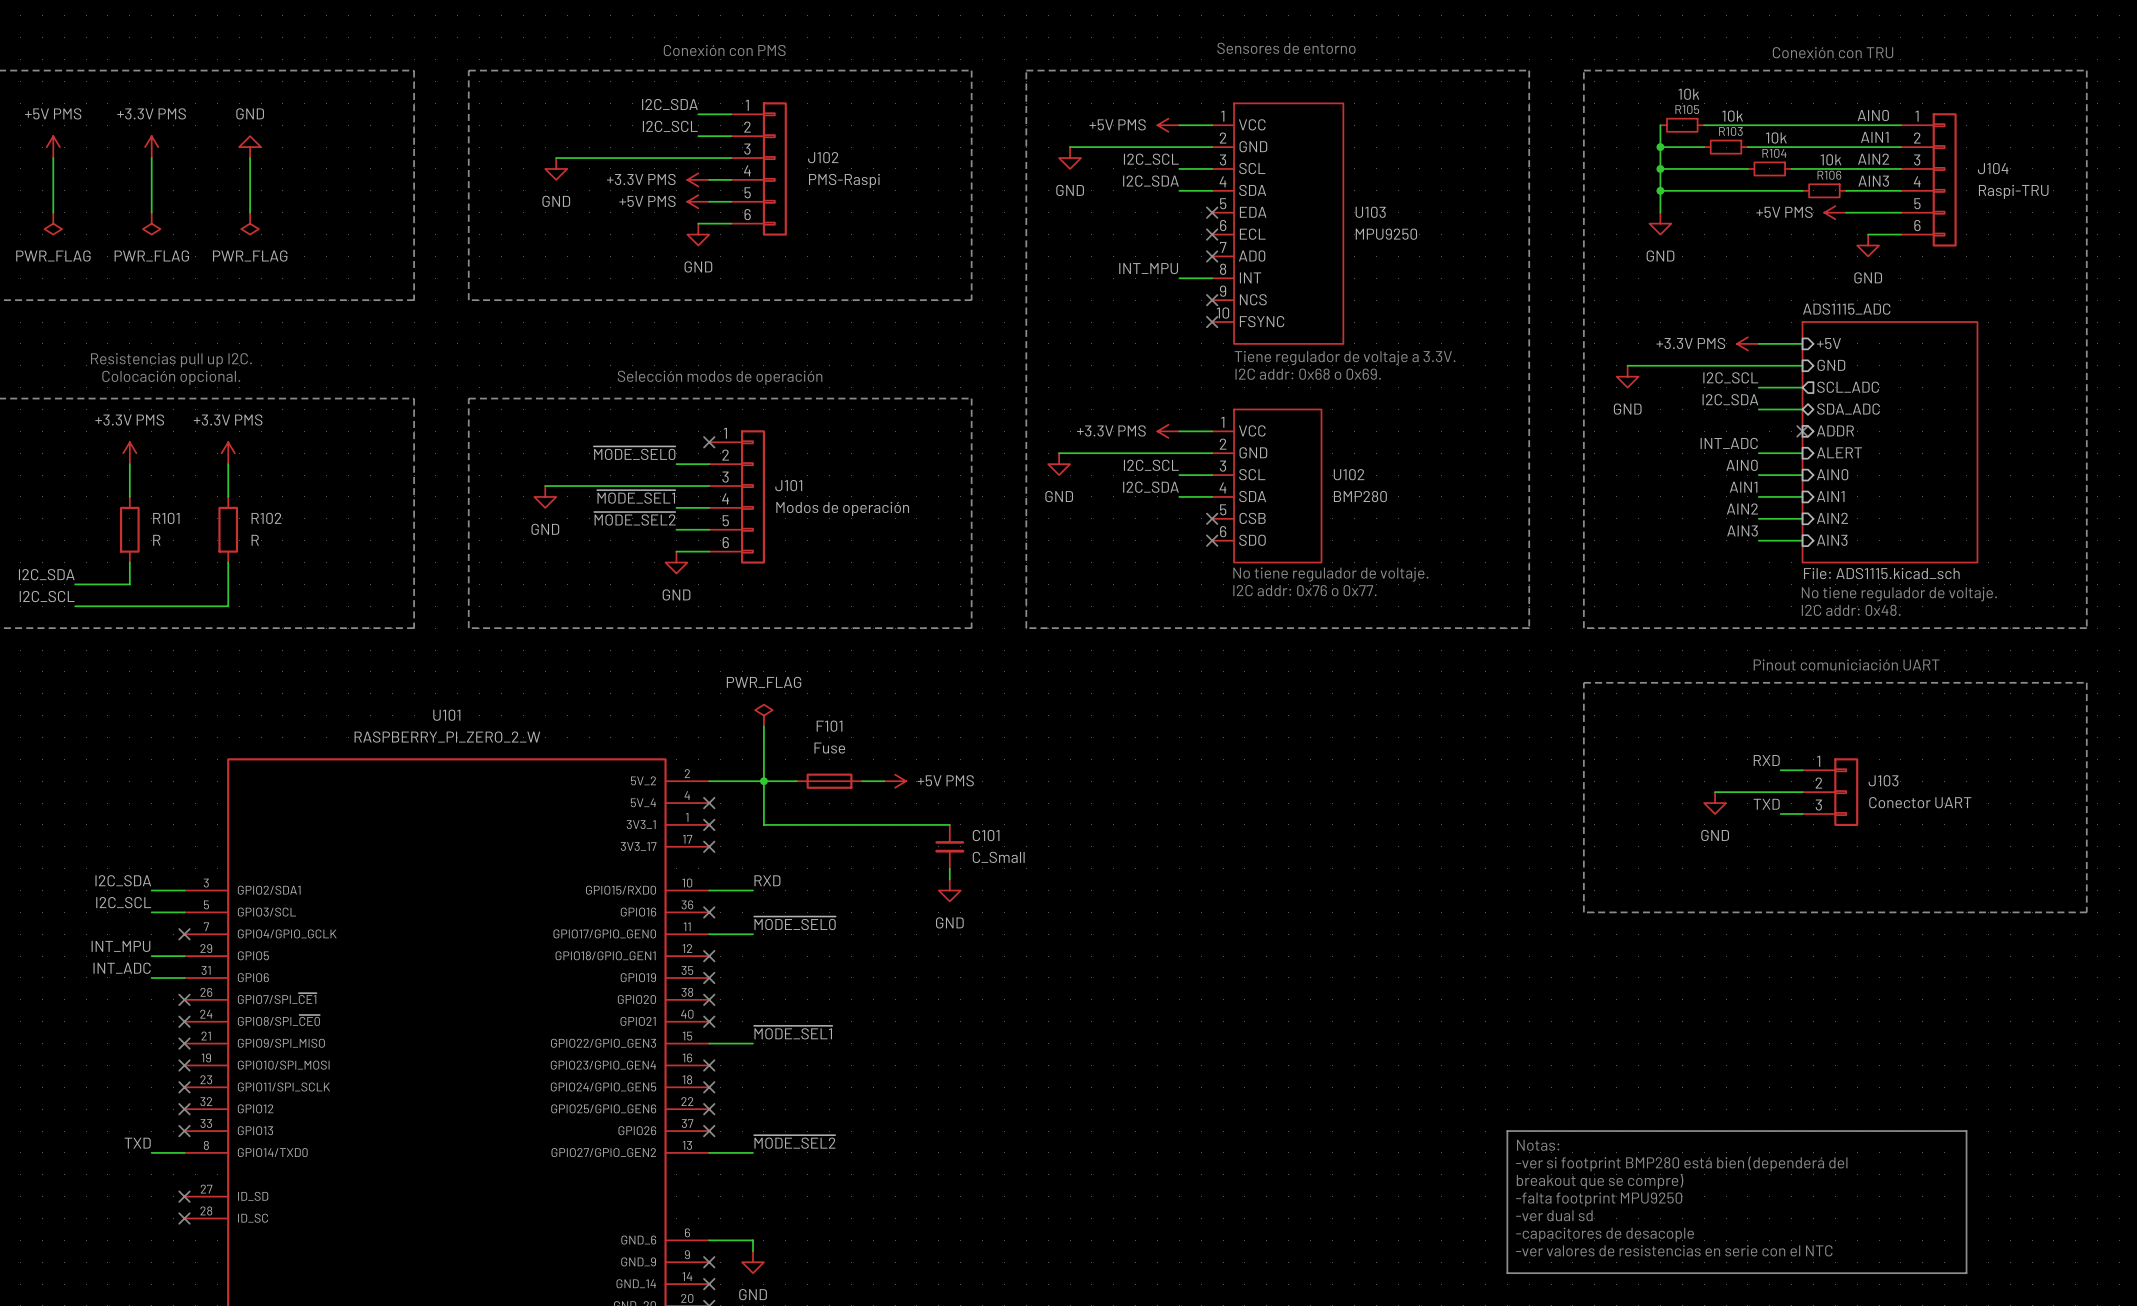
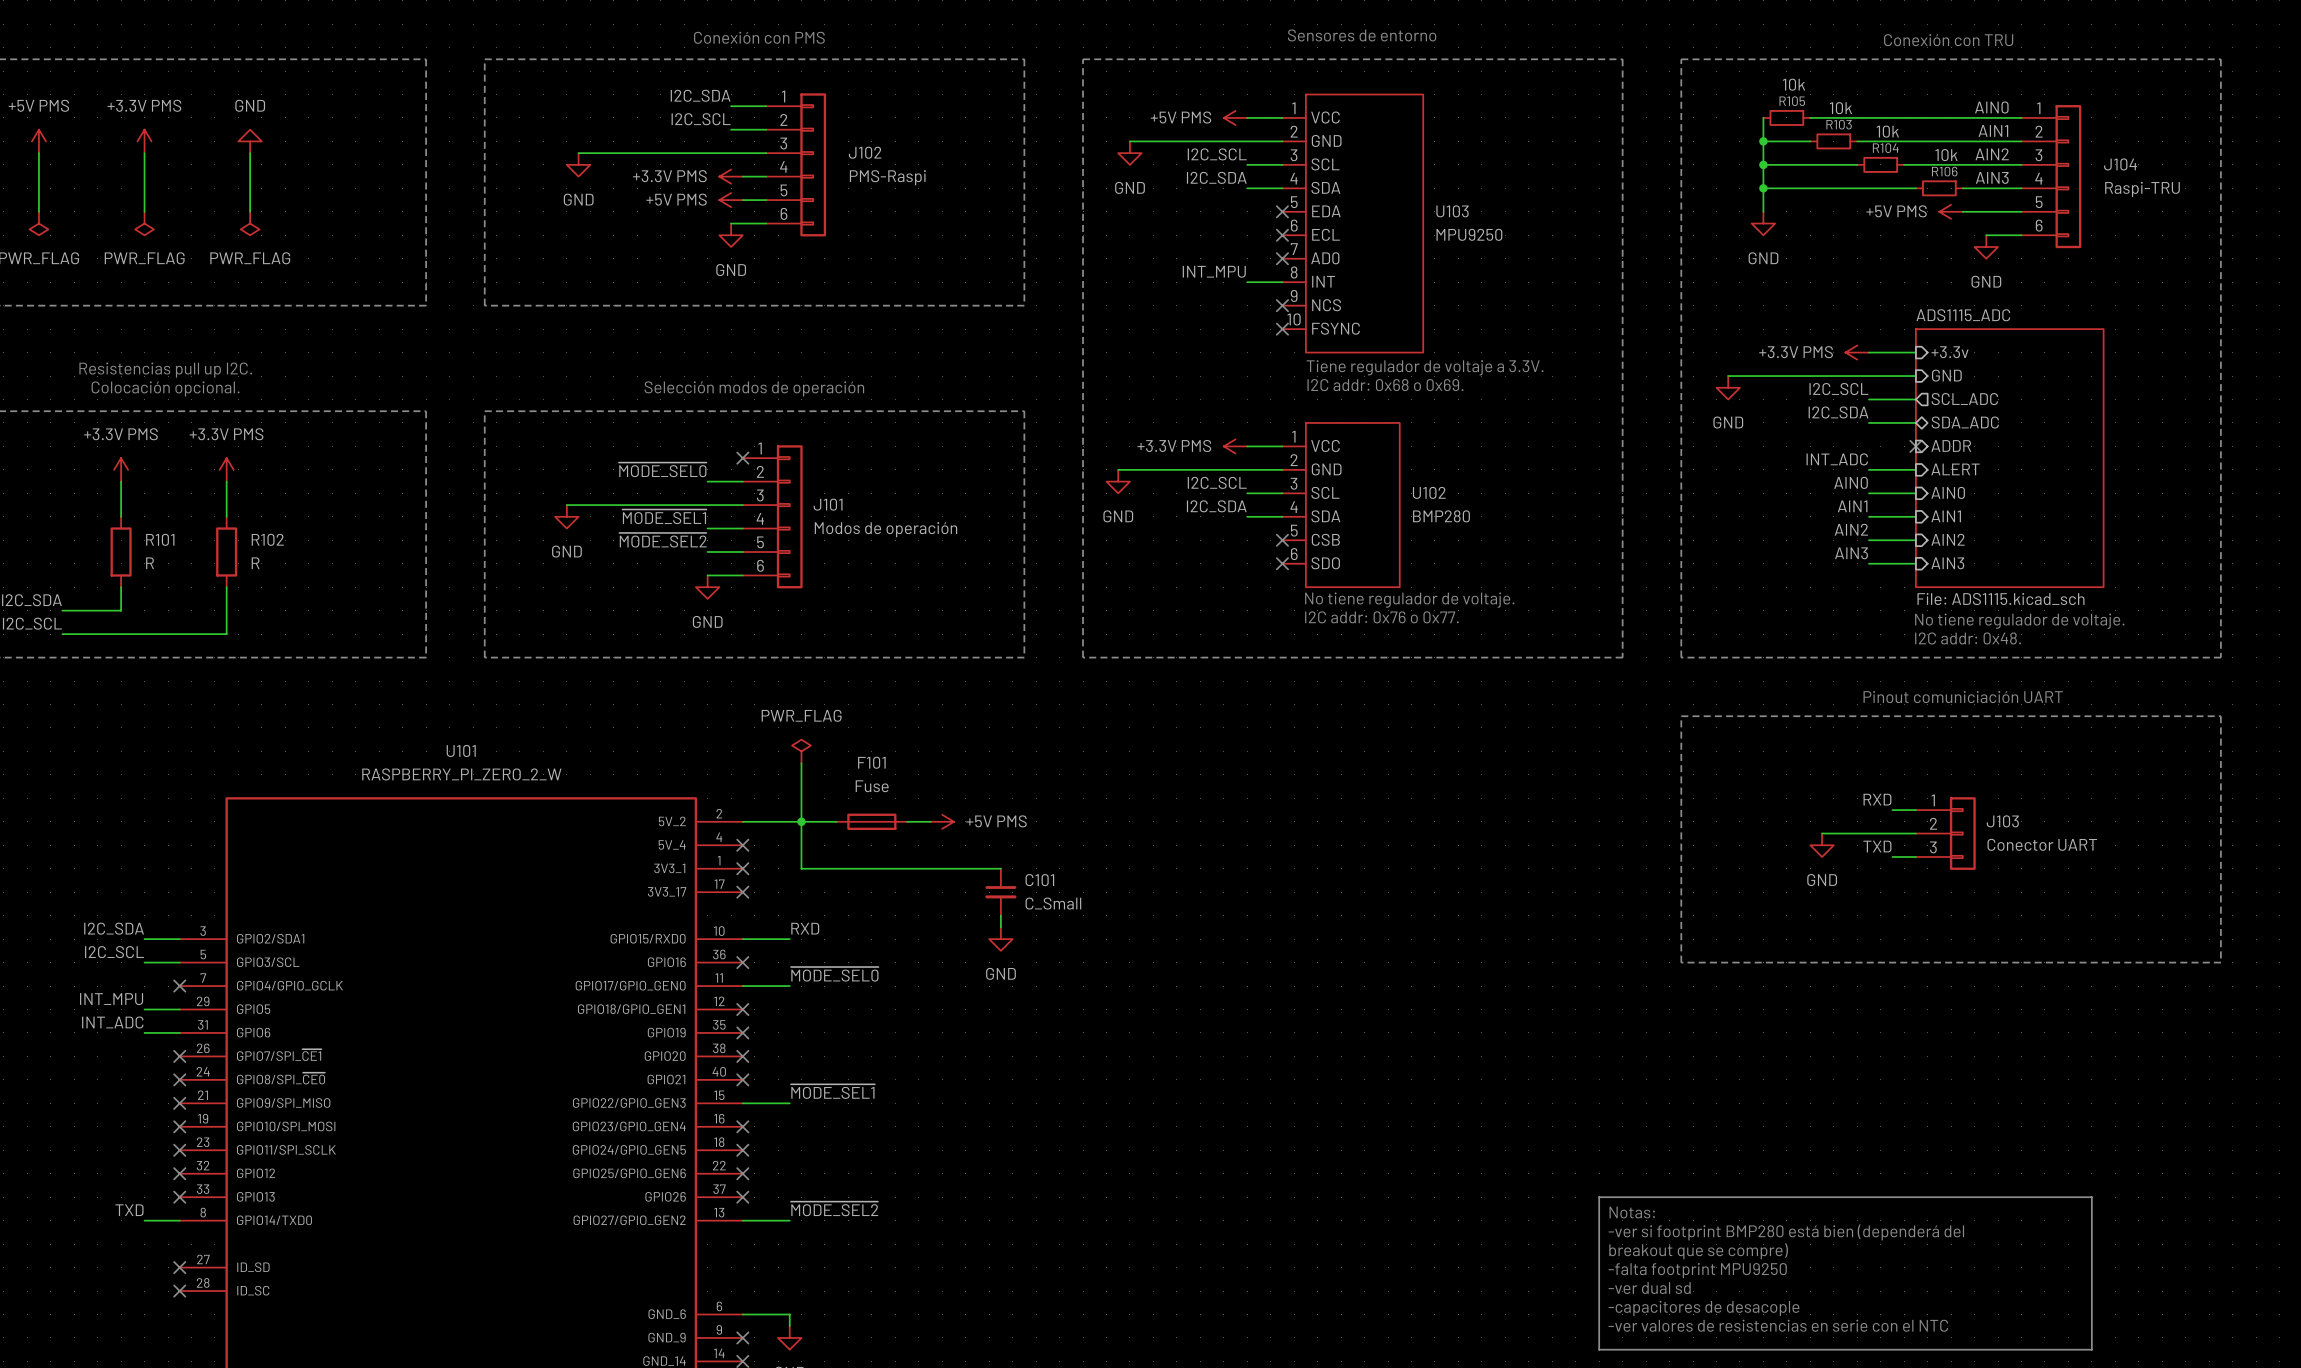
sheet pin: +5V (1828, 343) -> +3.3v (1950, 352)

